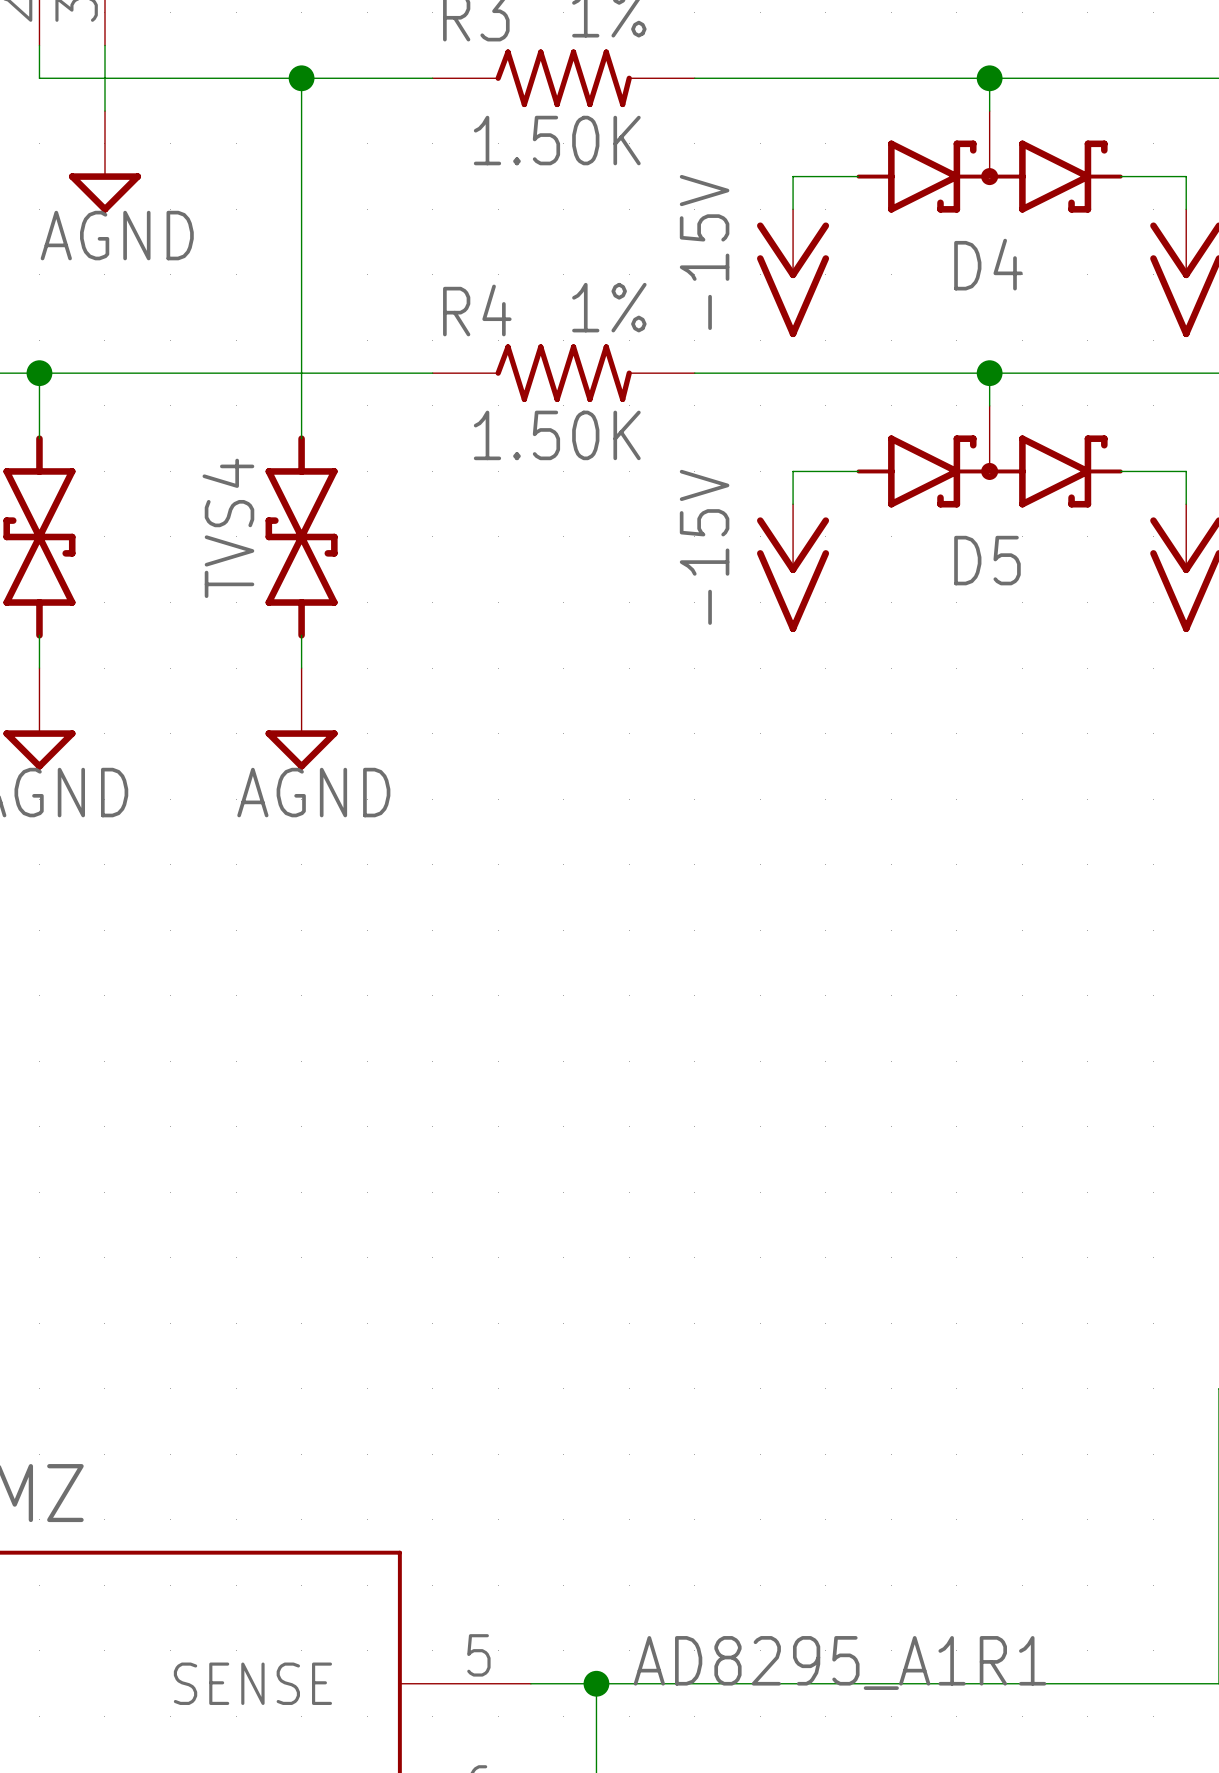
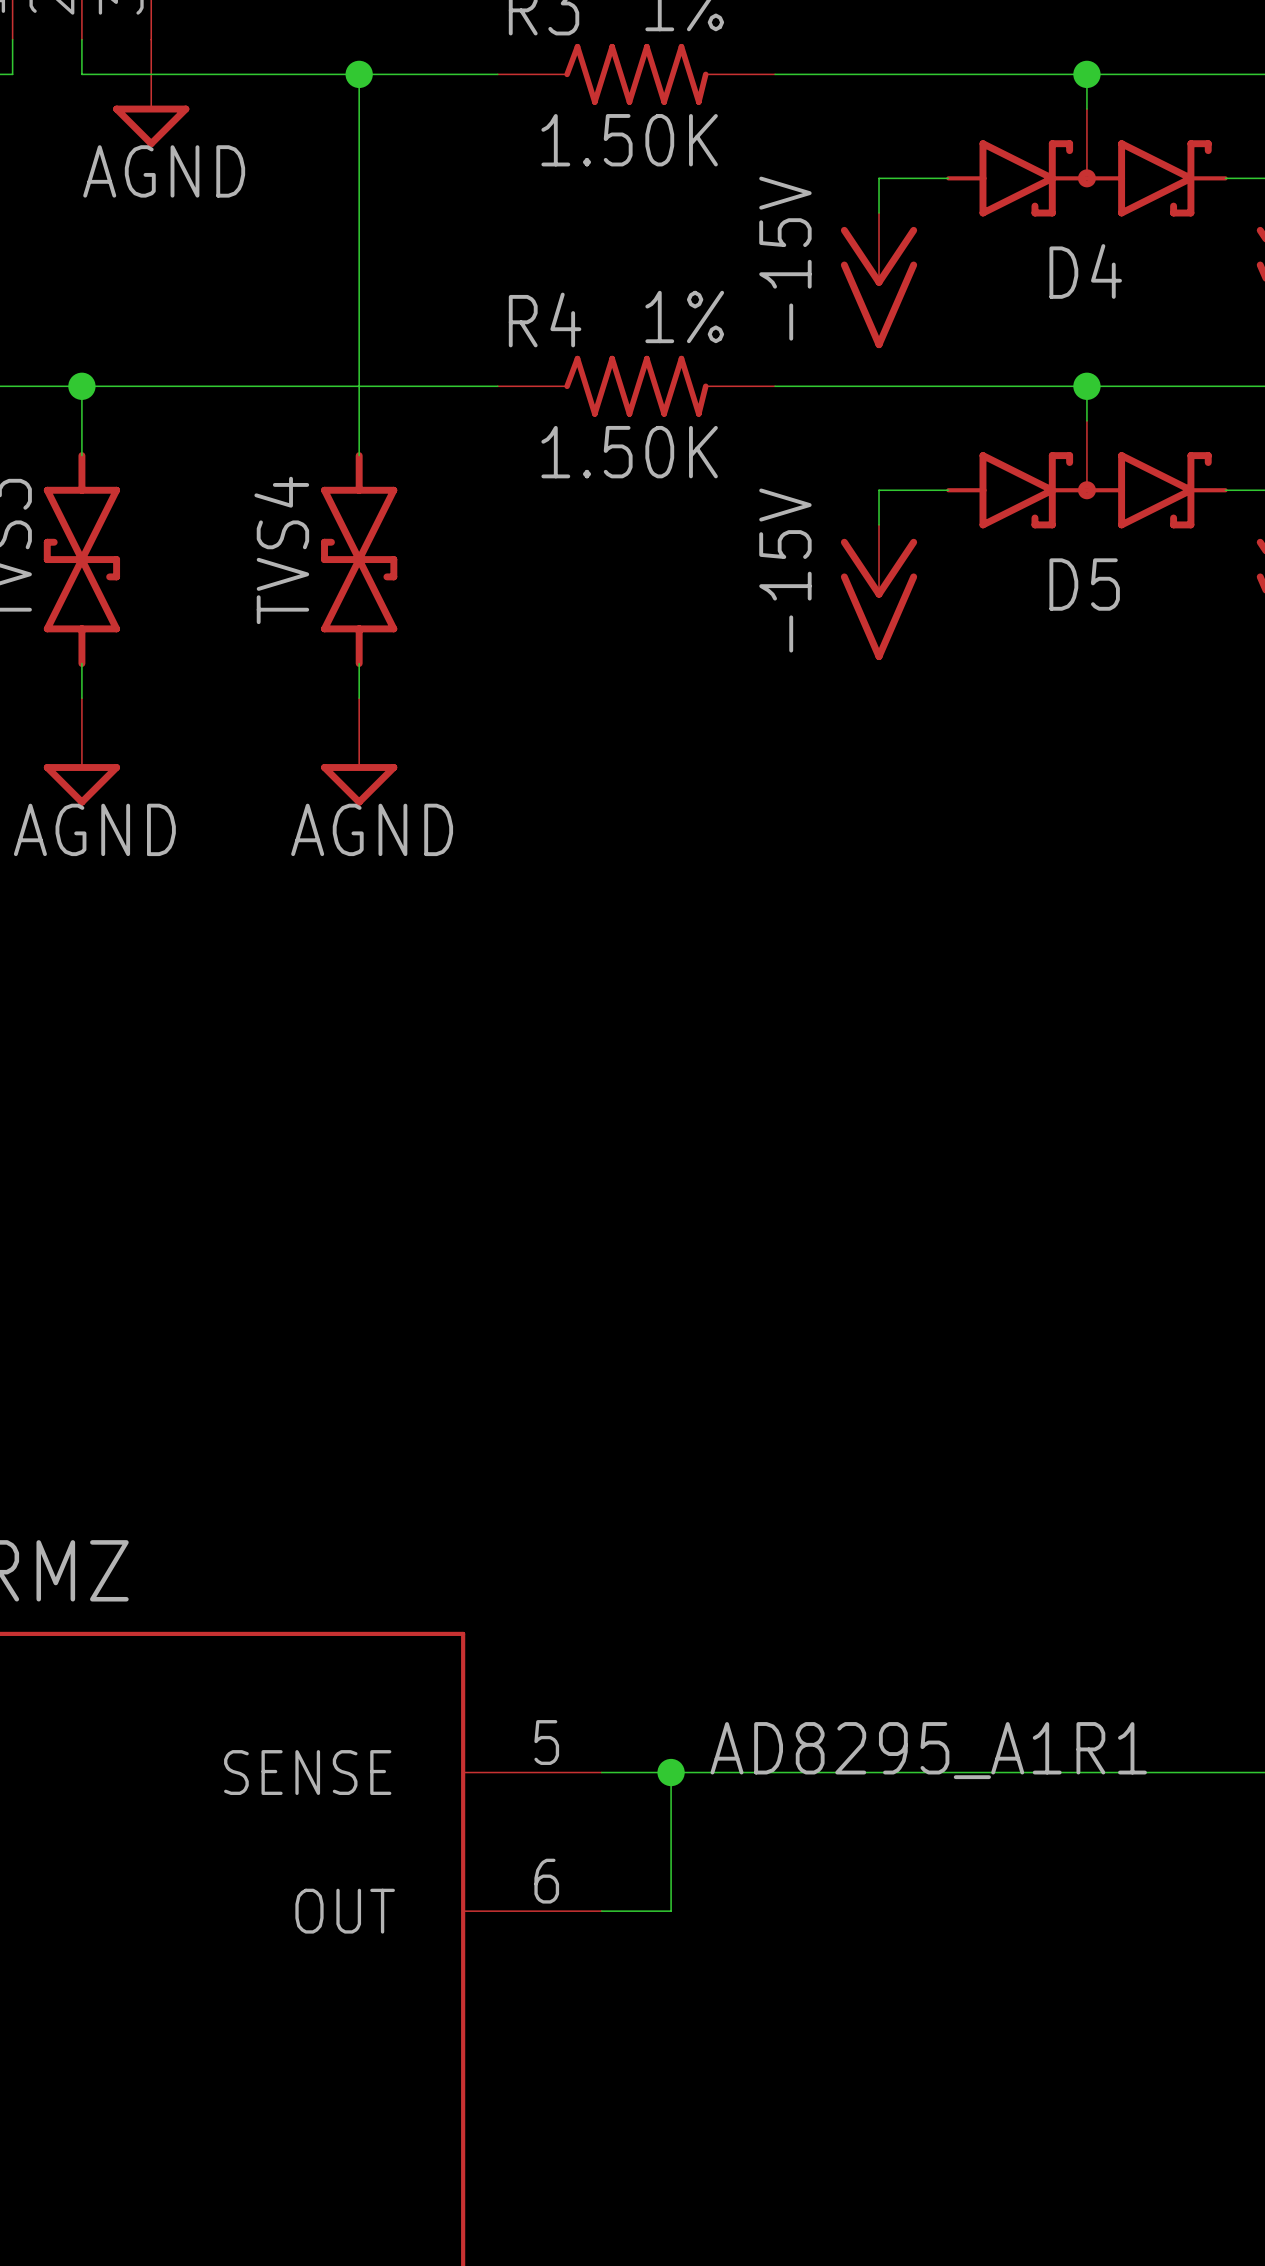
power symbol position: AGND (104, 161) -> AGND (151, 93)

